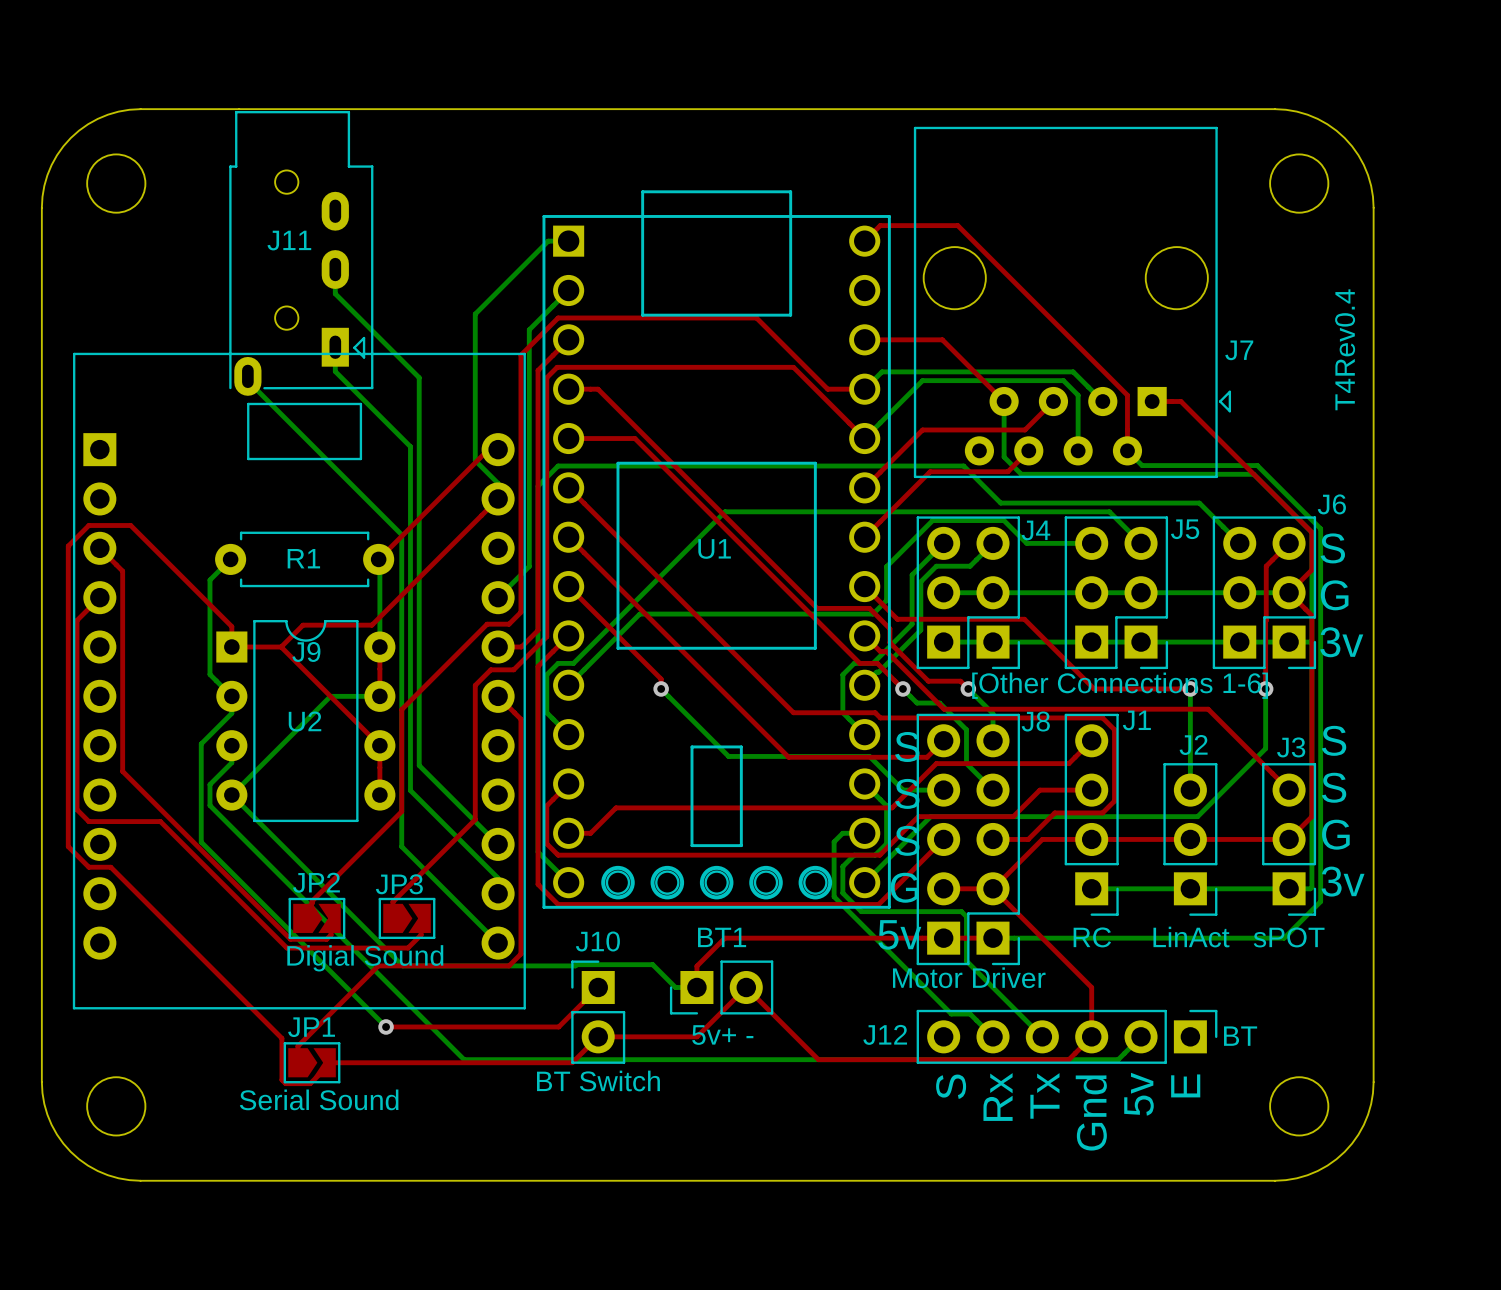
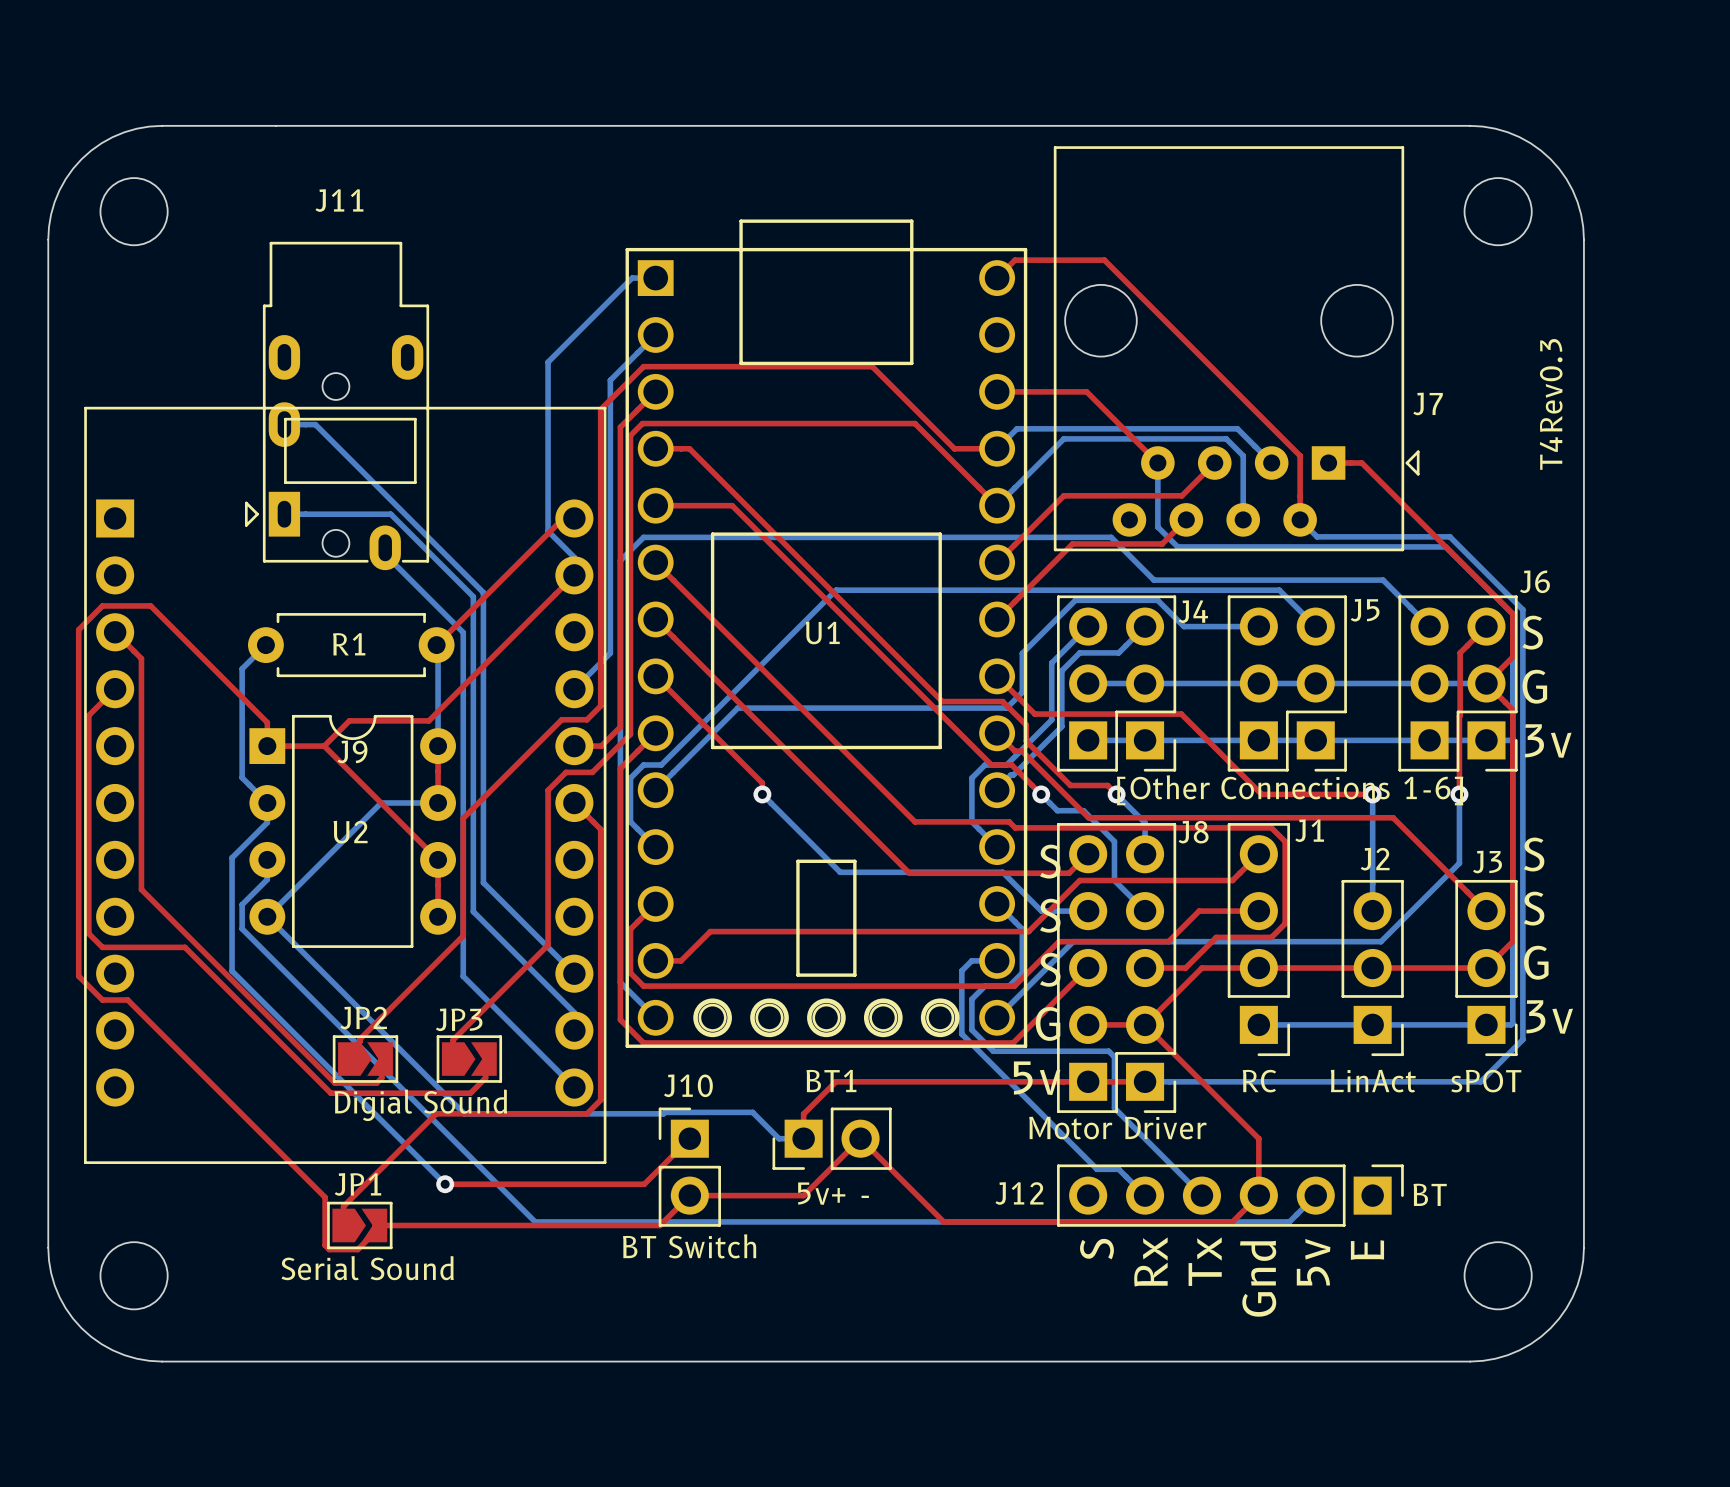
J11 footprint: [229, 111, 374, 396] -> [244, 241, 430, 571]
J11 name position: J11 (289, 240) -> J11 (339, 200)
bottom track: (335, 269) (335, 293) (419, 377) (419, 513) -> (284, 424) (315, 424) (483, 592)
bottom track: (335, 347) (335, 371) (410, 446) (410, 517) -> (284, 514) (390, 514) (473, 596)
text: T4Rev0.4 (1345, 349) -> T4Rev0.3 (1551, 404)
J9 footprint: [72, 352, 526, 1010] -> [83, 406, 607, 1164]
bottom track: (247, 376) (247, 380) (401, 534) (401, 548) -> (385, 547) (385, 554) (463, 632)

